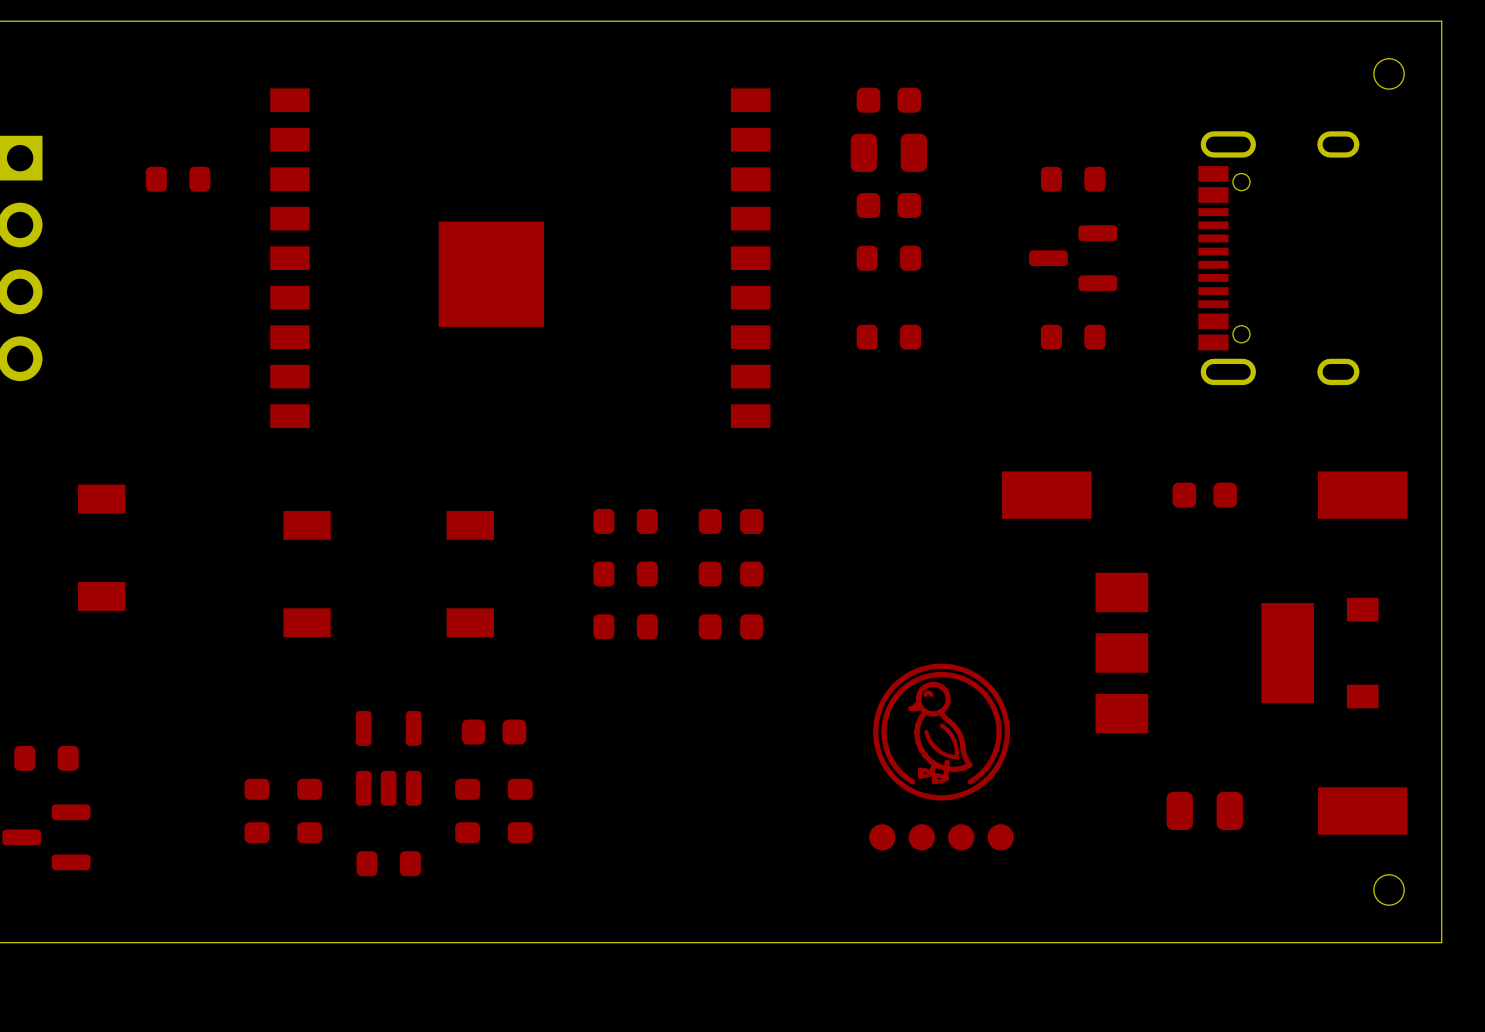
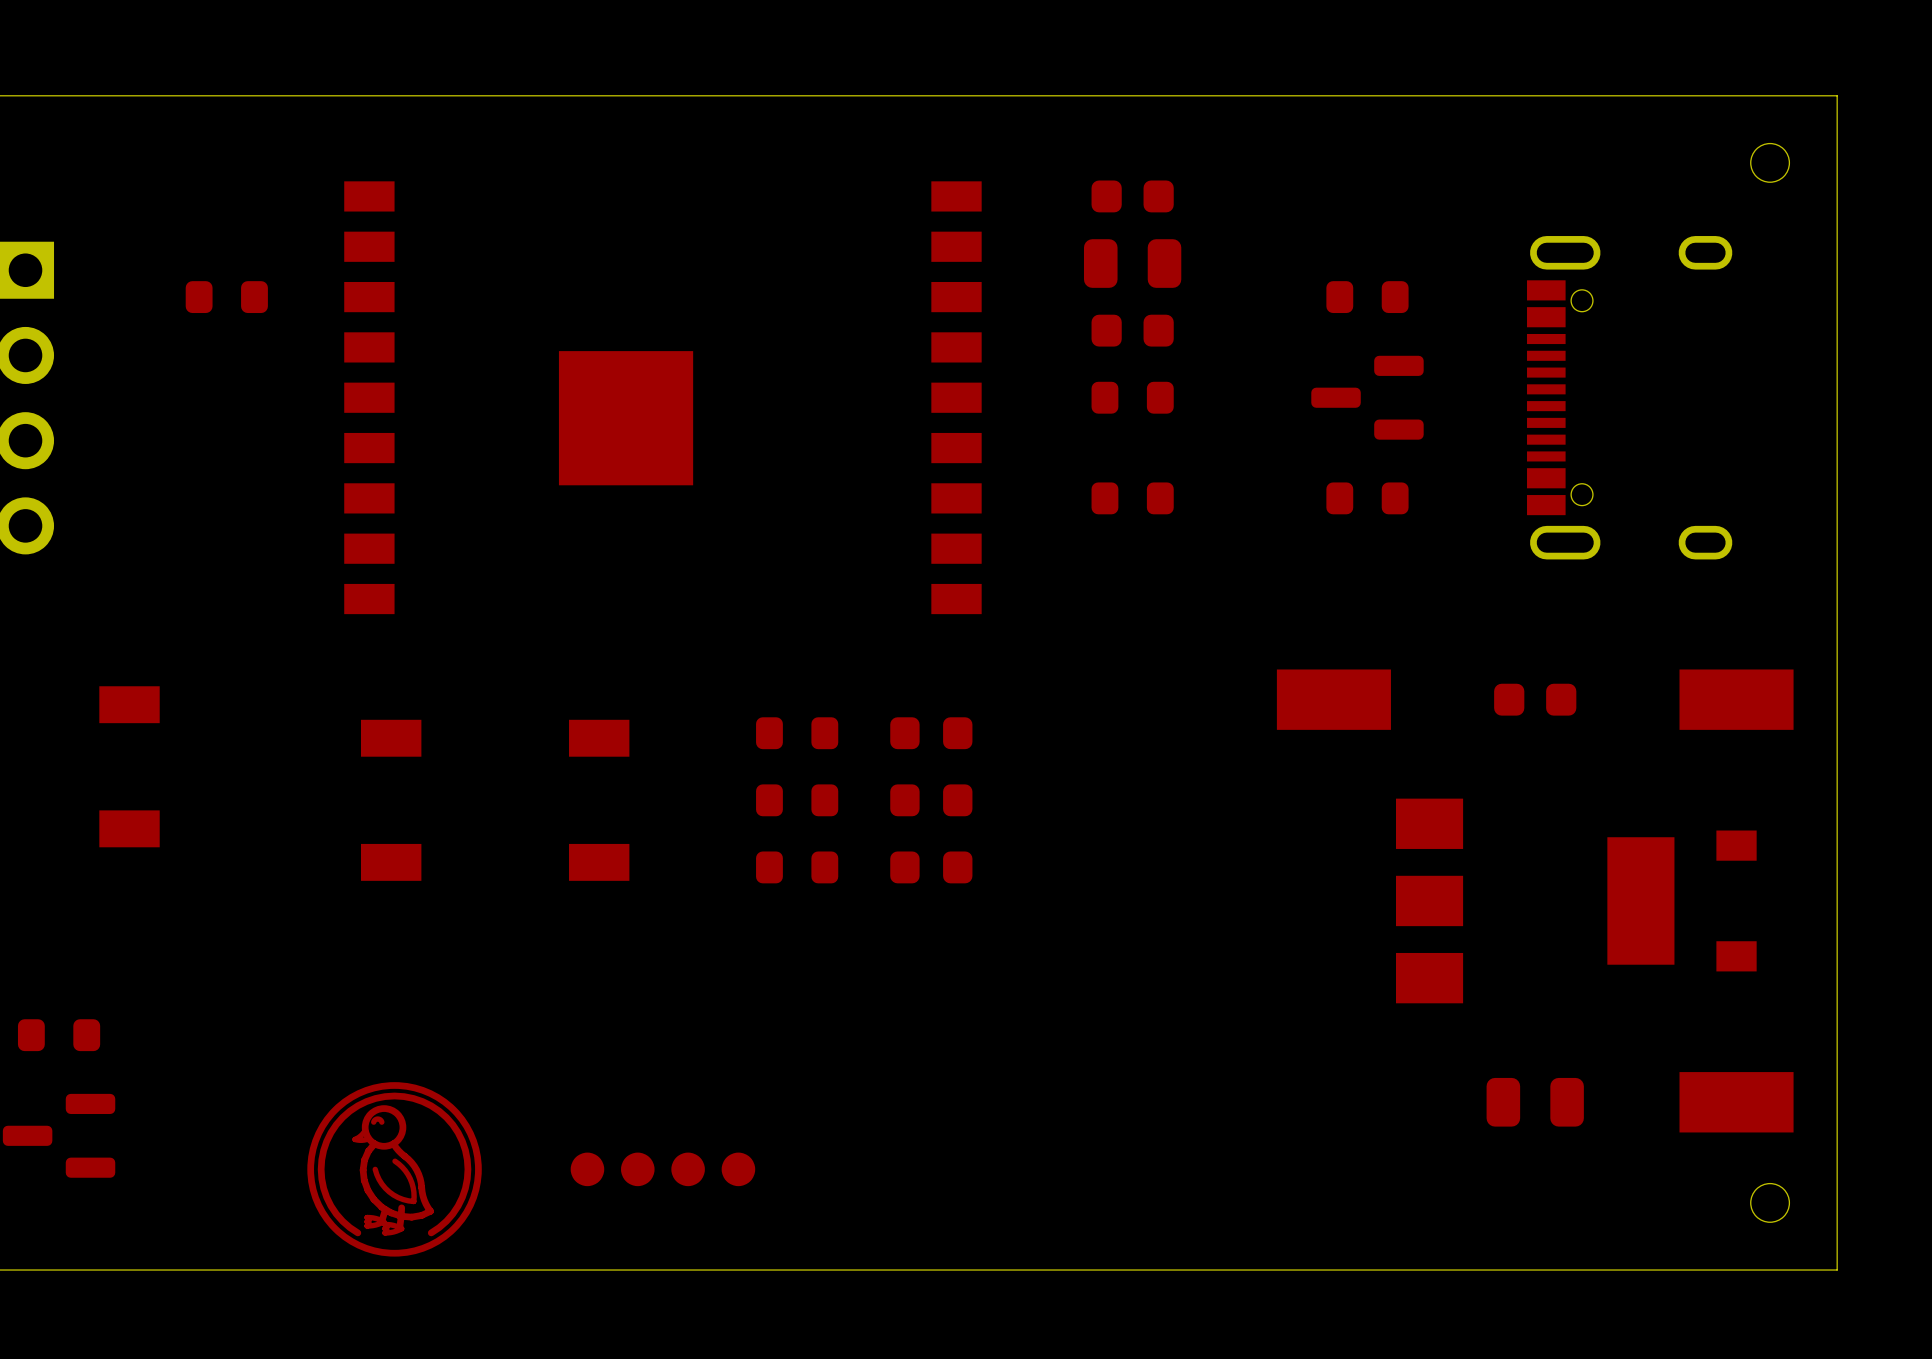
part: (493, 732) -> none
drawing position: (941, 732) -> (394, 1169)
part: (388, 758) -> none
part: (257, 811) -> none
part: (309, 811) -> none
part: (467, 811) -> none
part: (520, 811) -> none
drawing position: (941, 837) -> (662, 1169)
part: (388, 863) -> none

